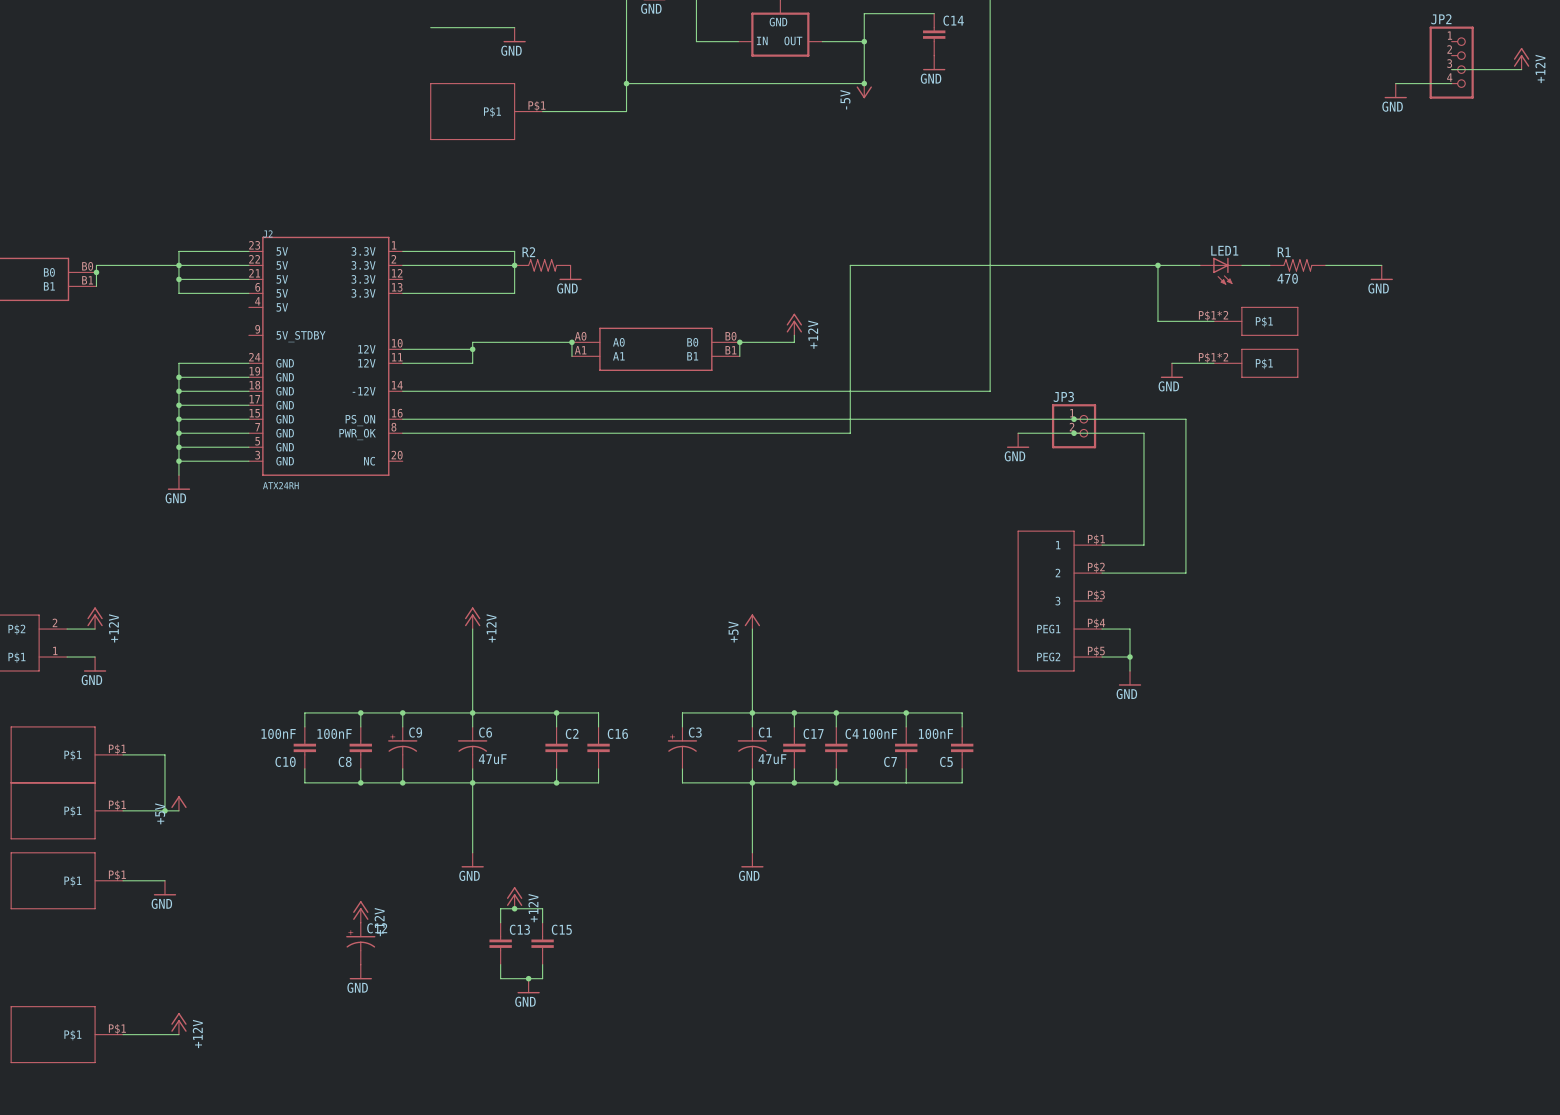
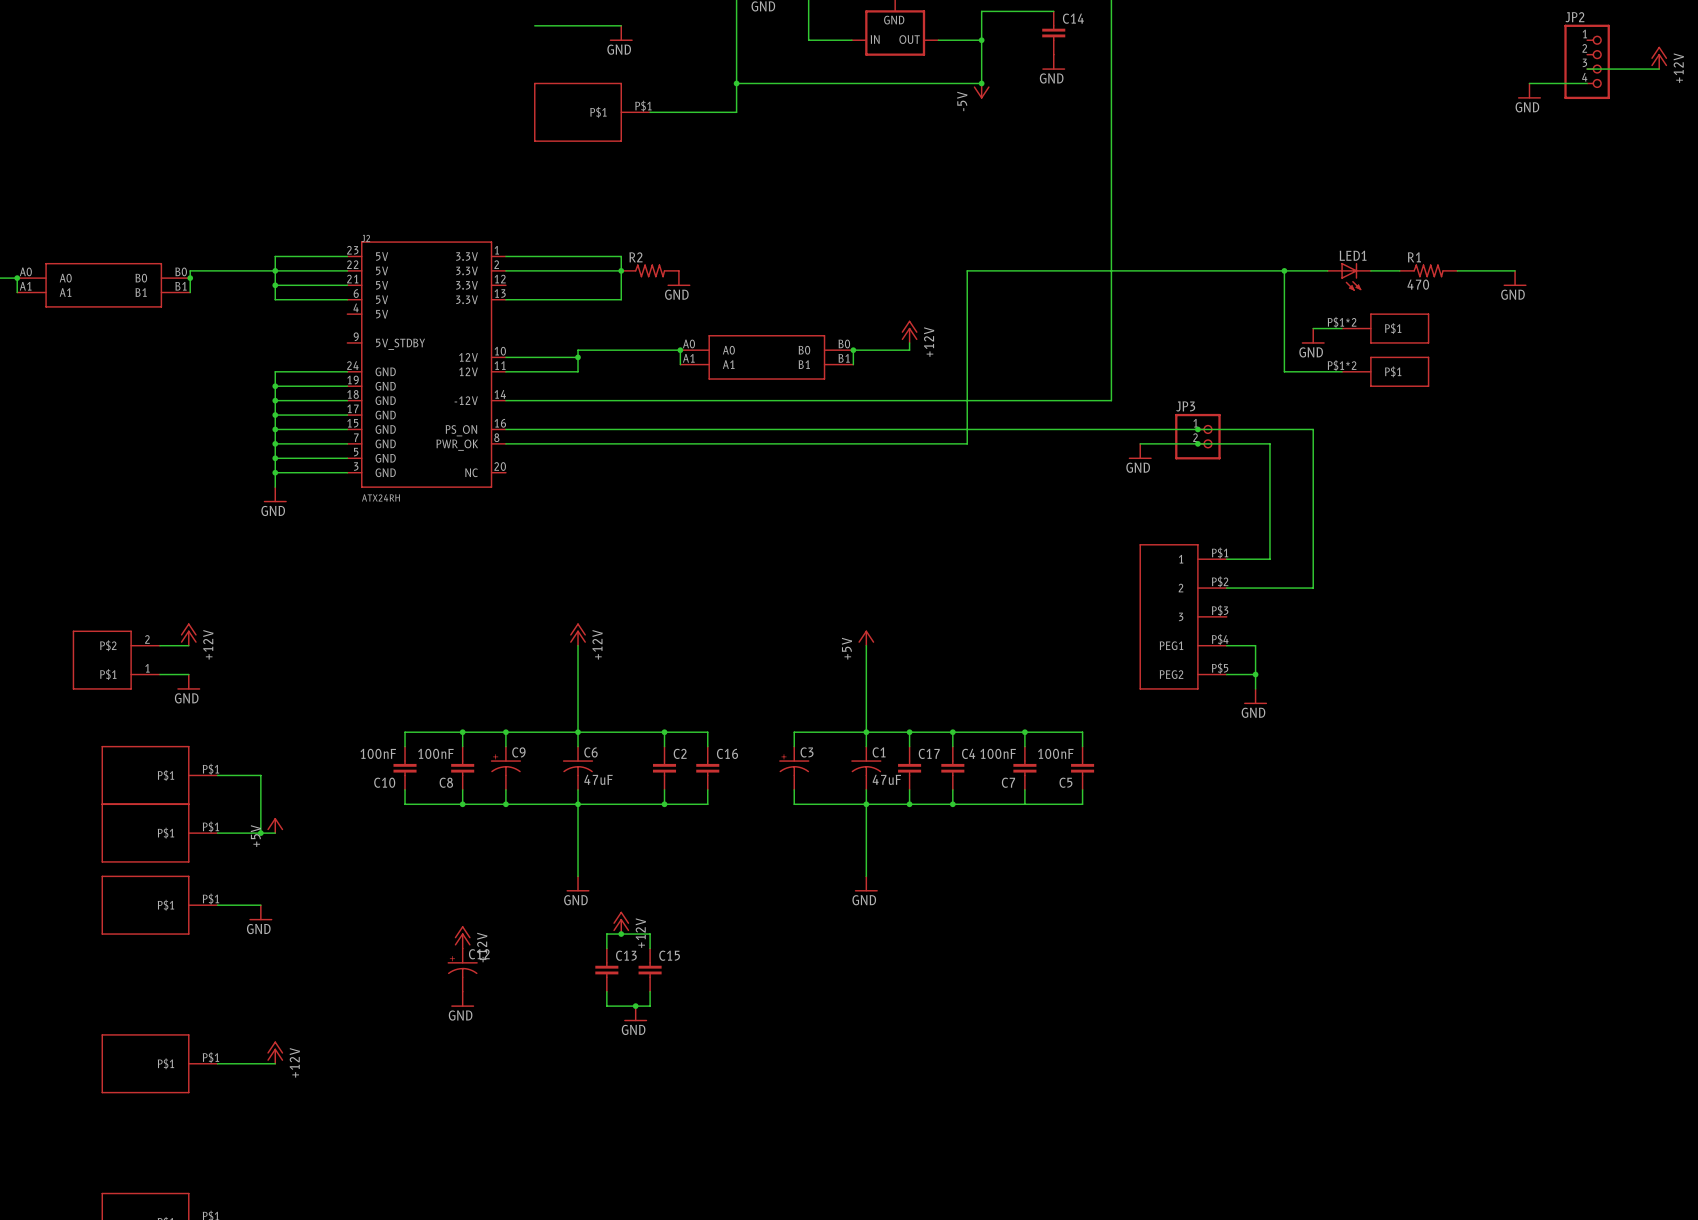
wire: (1157, 321) (1185, 321) -> (1284, 328) (1284, 371) (1298, 371)
power symbol position: GND (1171, 370) -> GND (1313, 336)

